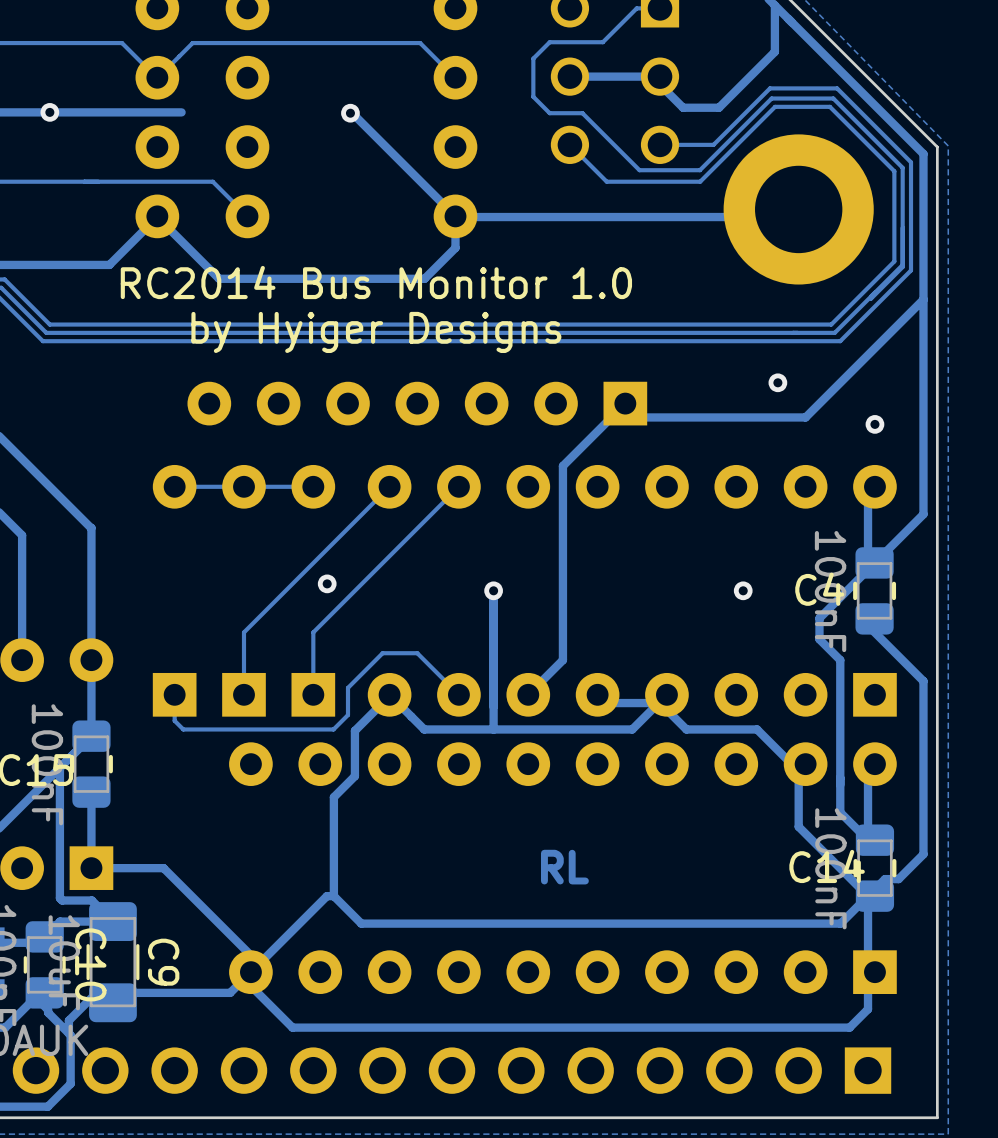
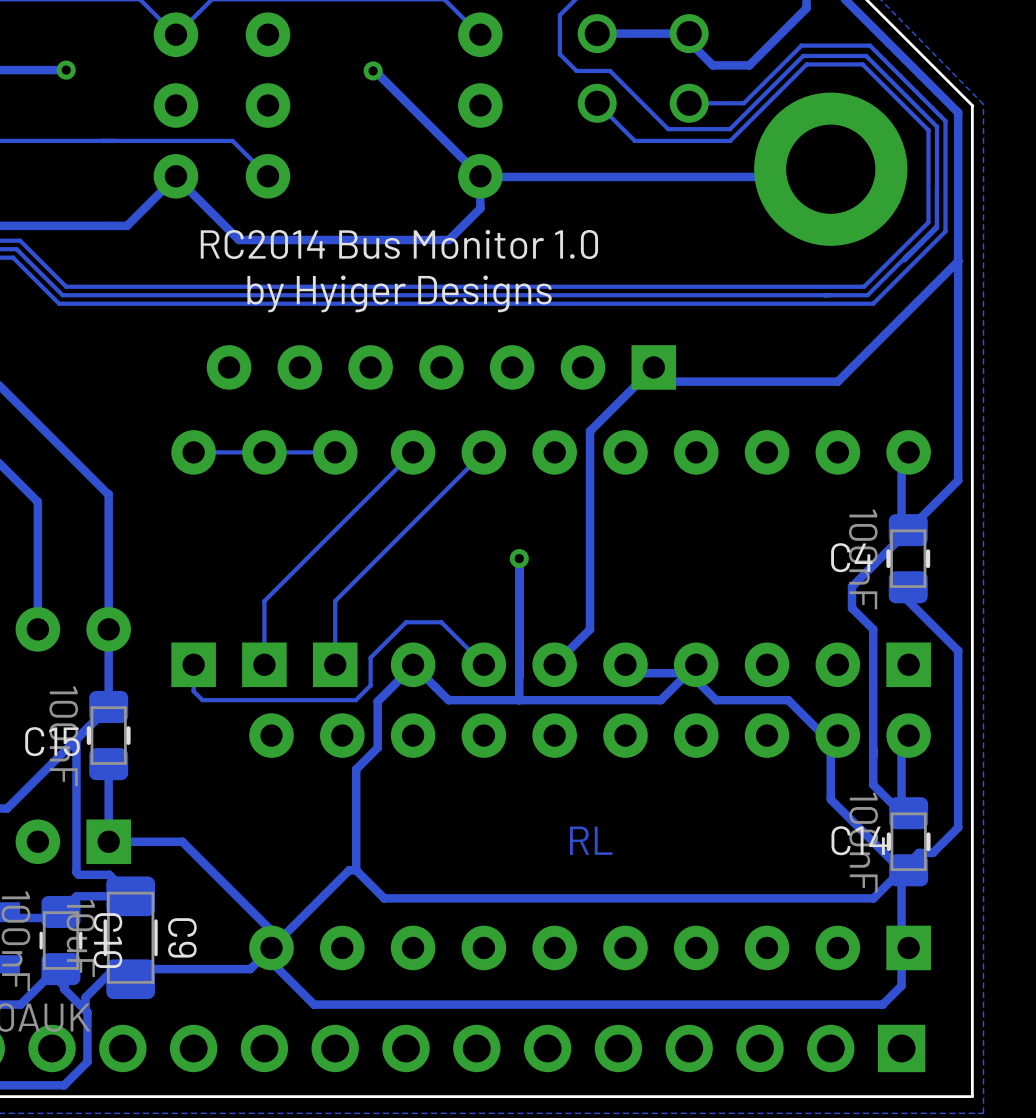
track: (181, 112) (49, 112) -> none
via: (777, 382) -> none
via: (874, 424) -> none
via: (327, 583) -> none
via: (743, 590) -> none

